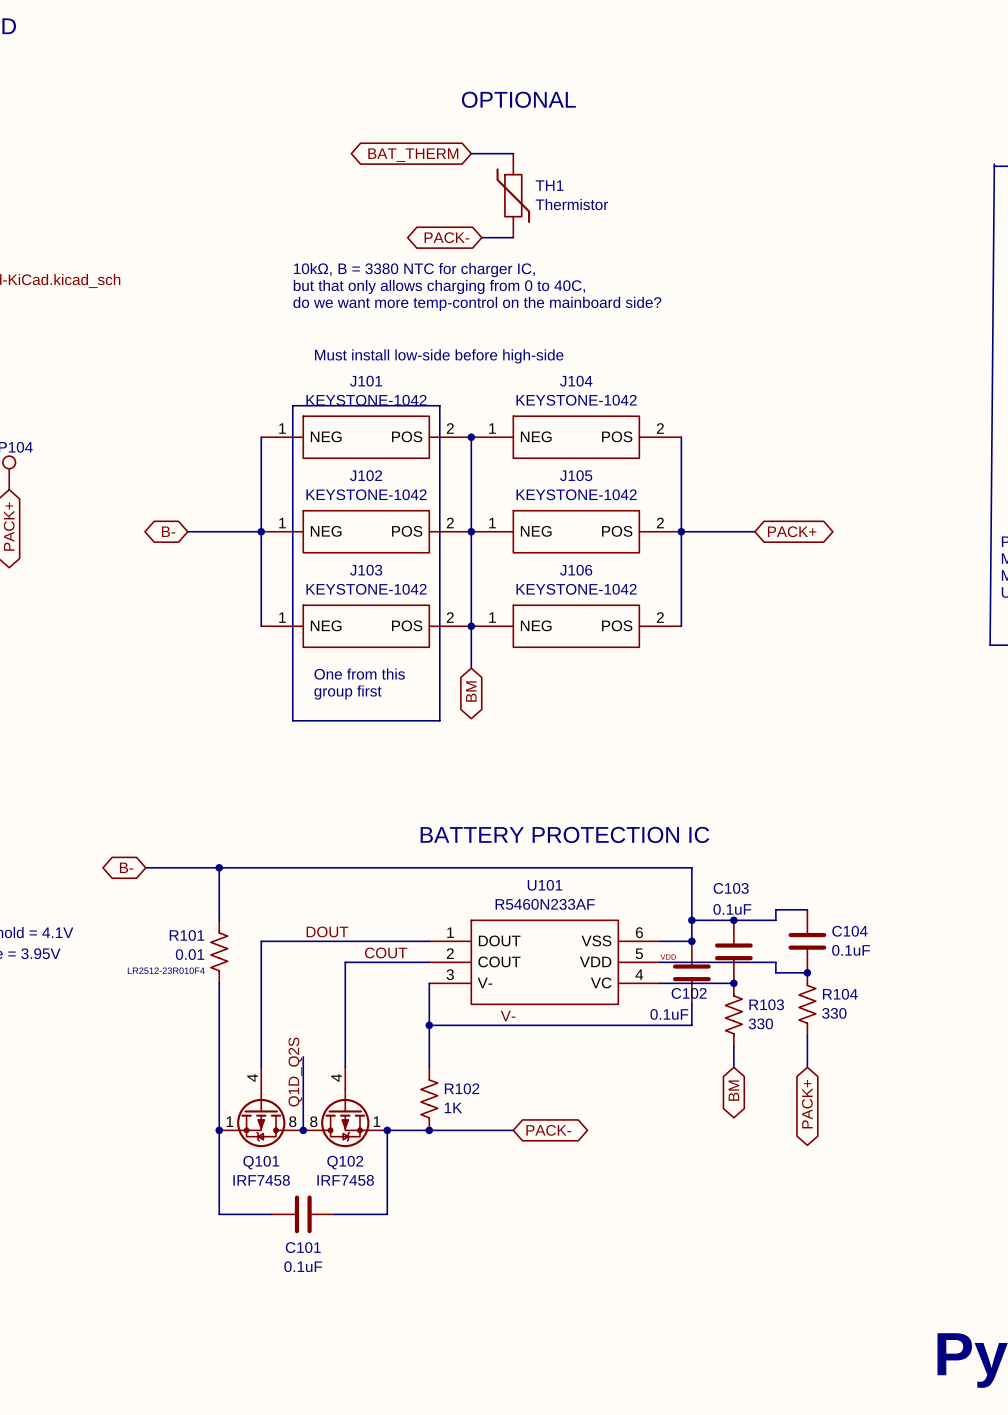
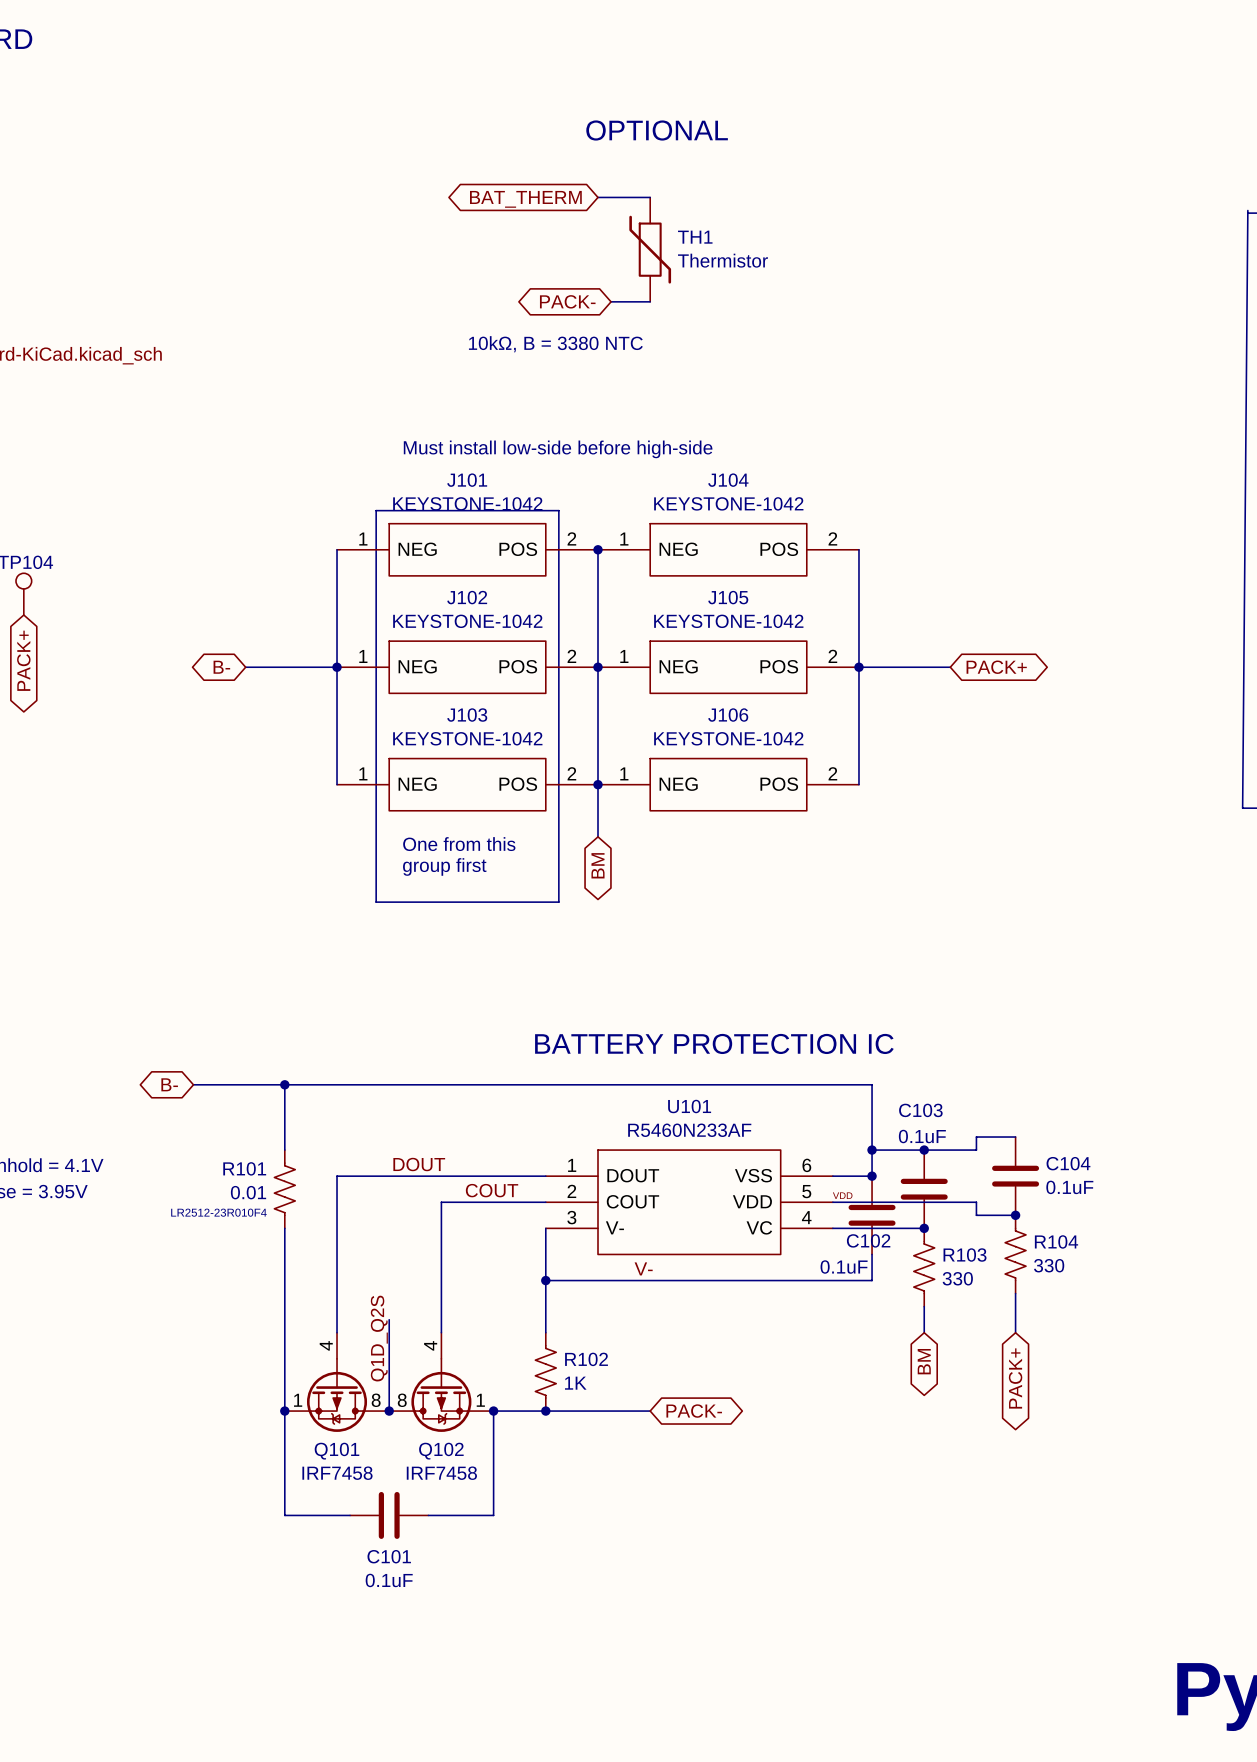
text: 10kΩ, B = 3380 NTC for charger IC, (414, 270) -> 10kΩ, B = 3380 NTC (555, 344)
text: but that only allows charging from 0 to 40C, (439, 286) -> none
text: do we want more temp-control on the mainboard side? (477, 303) -> none

